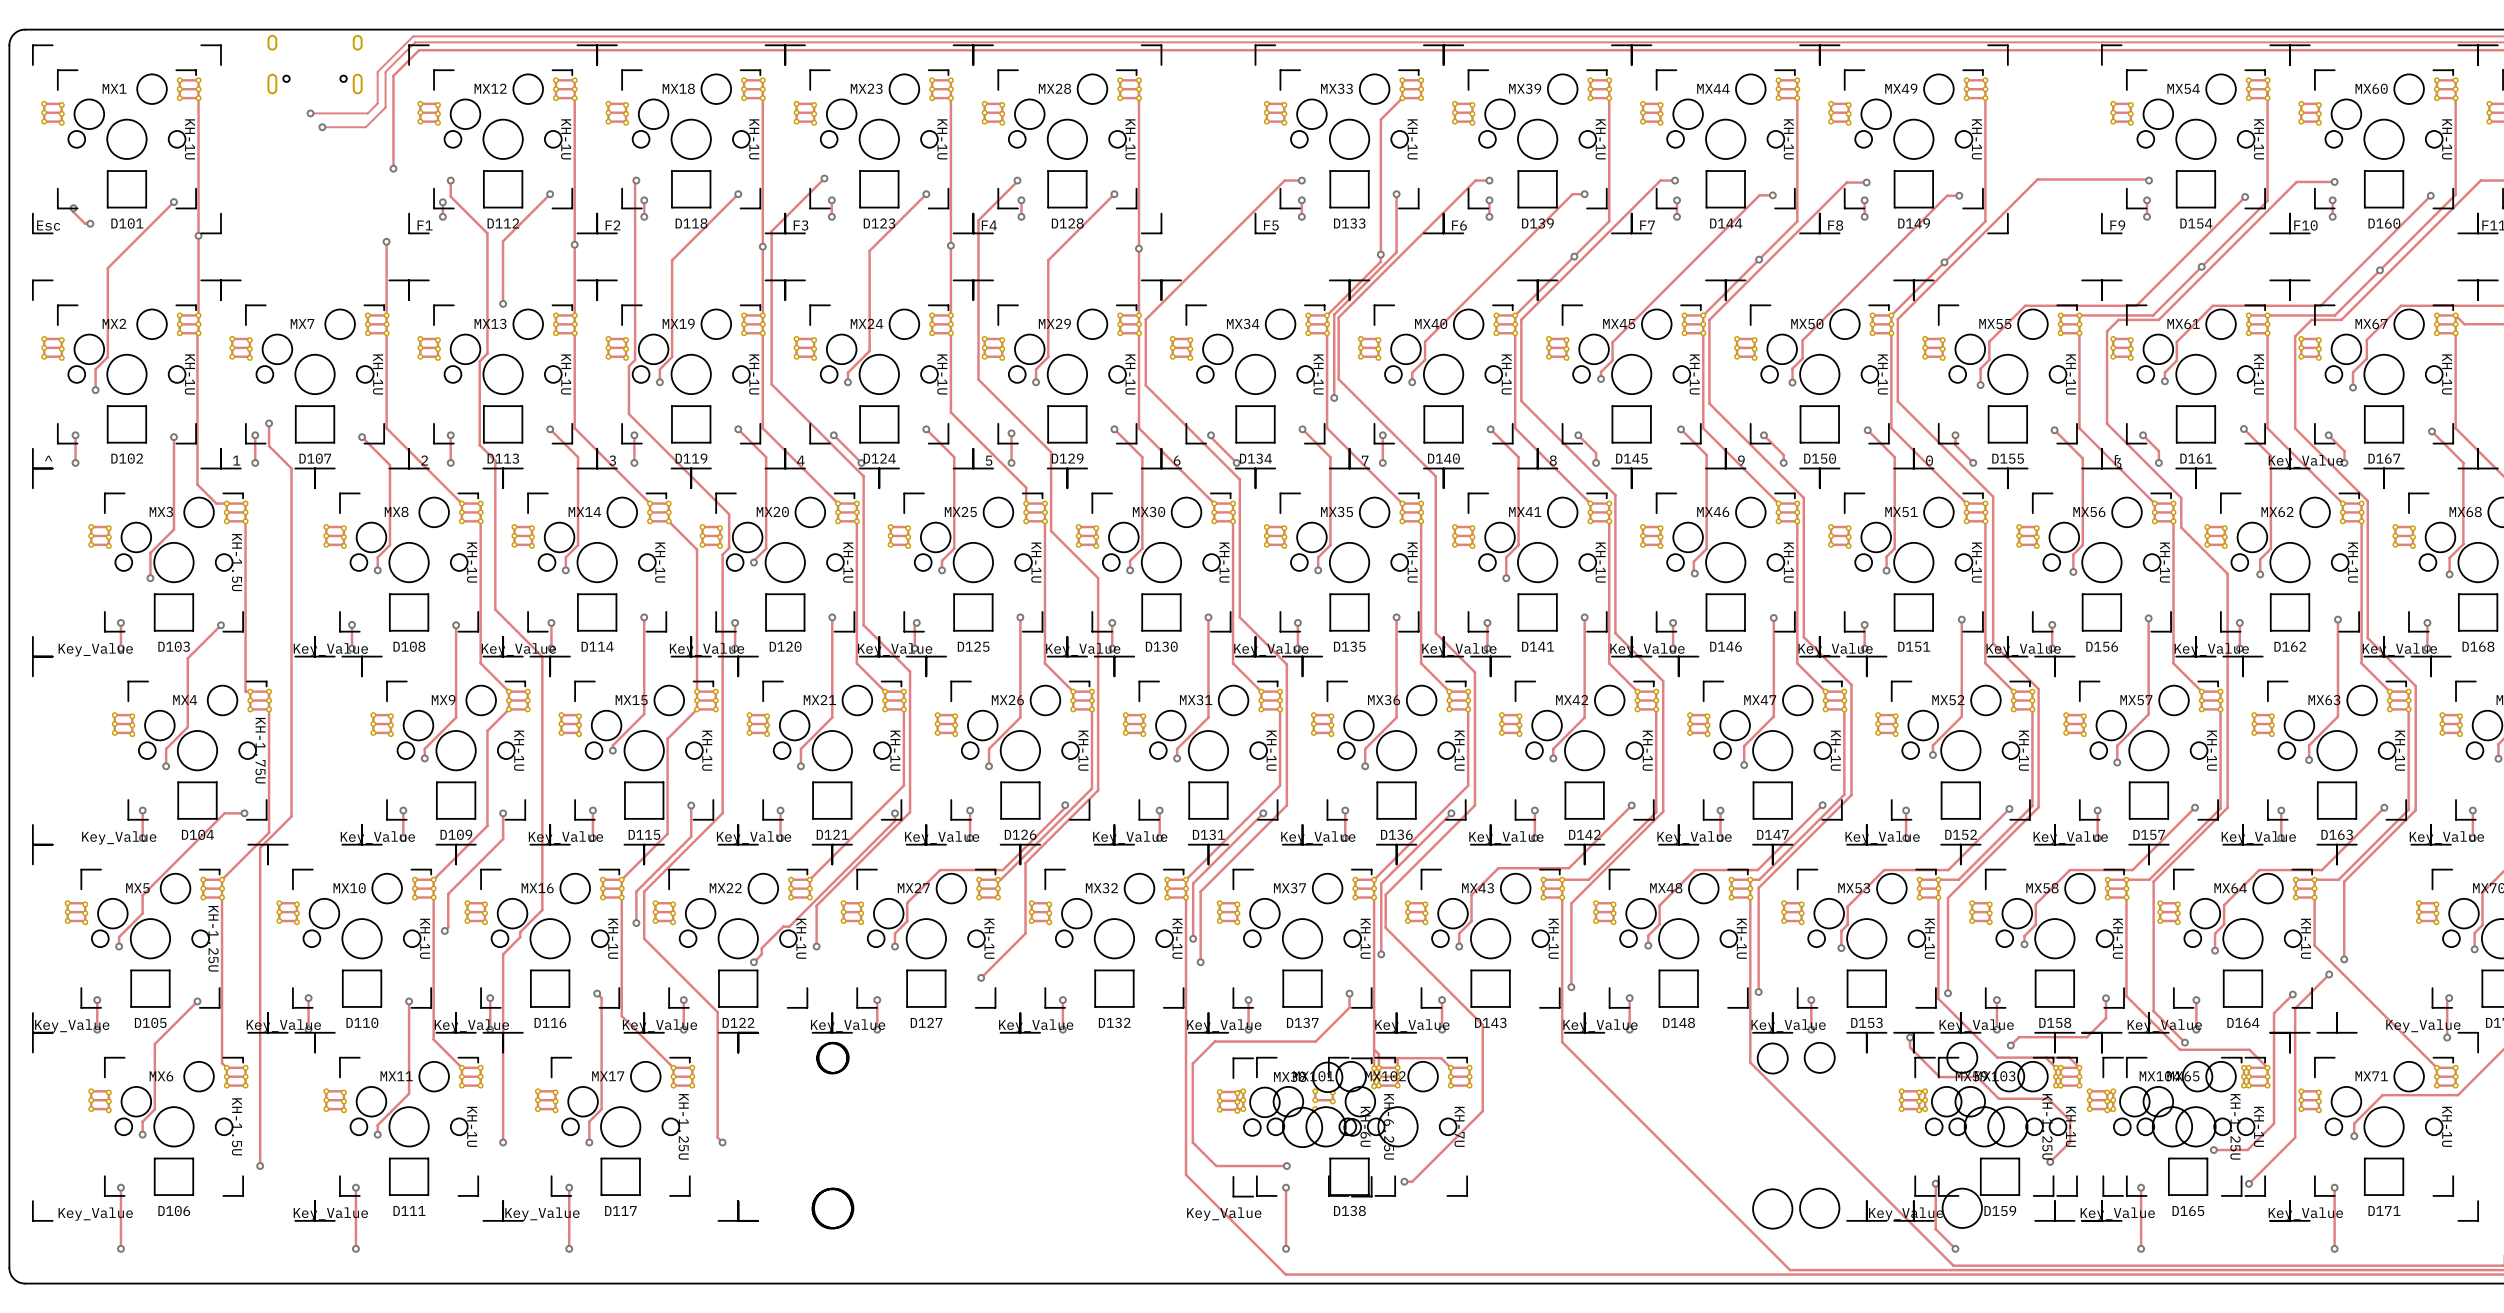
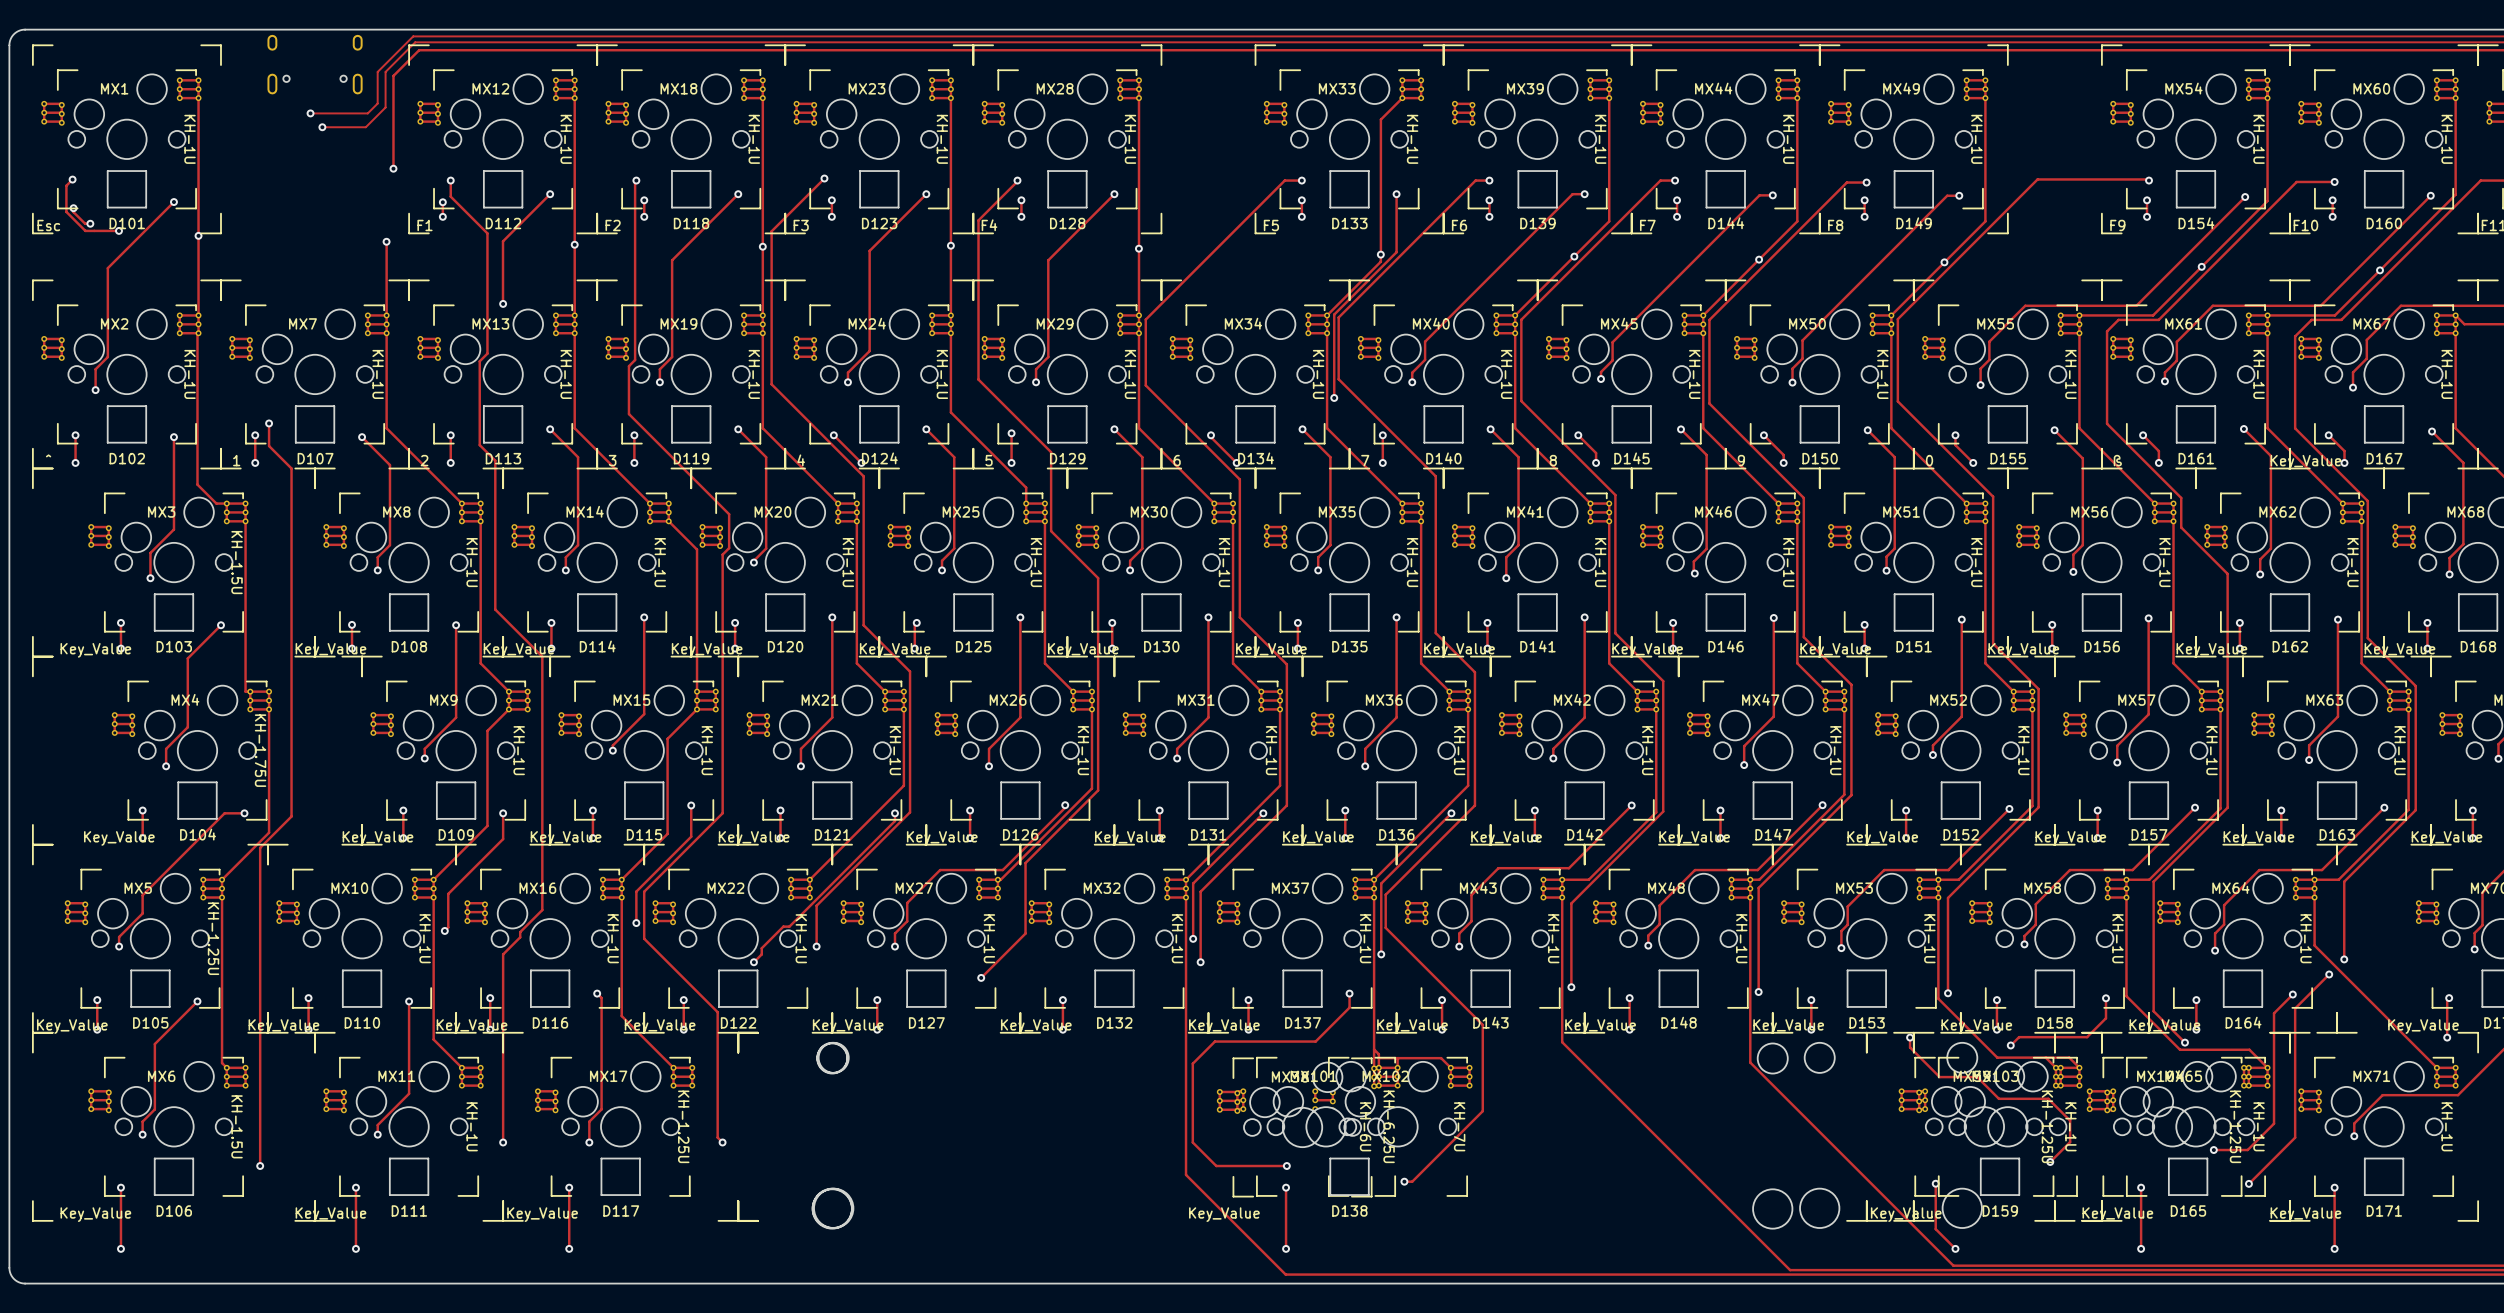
track: none -> (72, 179) (66, 185) (66, 211) (85, 230) (118, 230)
via: none -> (72, 179)
via: none -> (118, 230)

